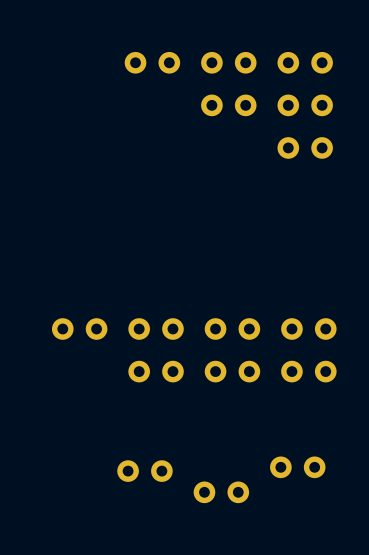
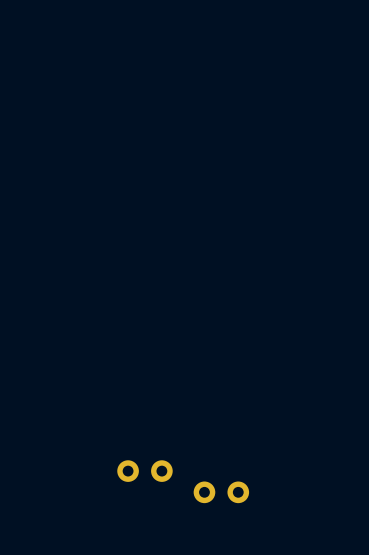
part: (152, 62) -> none
part: (228, 62) -> none
part: (305, 62) -> none
part: (228, 105) -> none
part: (305, 105) -> none
part: (305, 147) -> none
part: (79, 328) -> none
part: (156, 328) -> none
part: (232, 328) -> none
part: (308, 328) -> none
part: (156, 371) -> none
part: (232, 371) -> none
part: (308, 371) -> none
part: (297, 467) -> none

